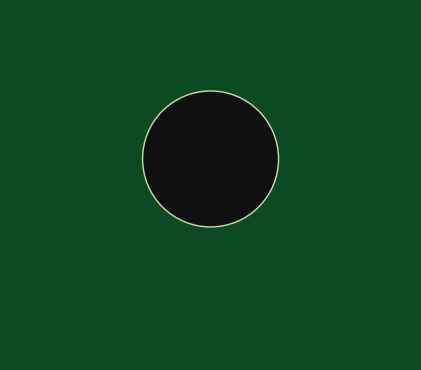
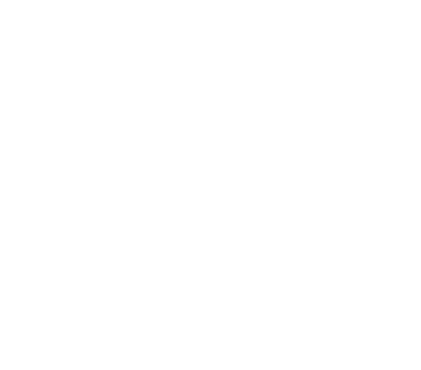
hole: (210, 158) -> none

